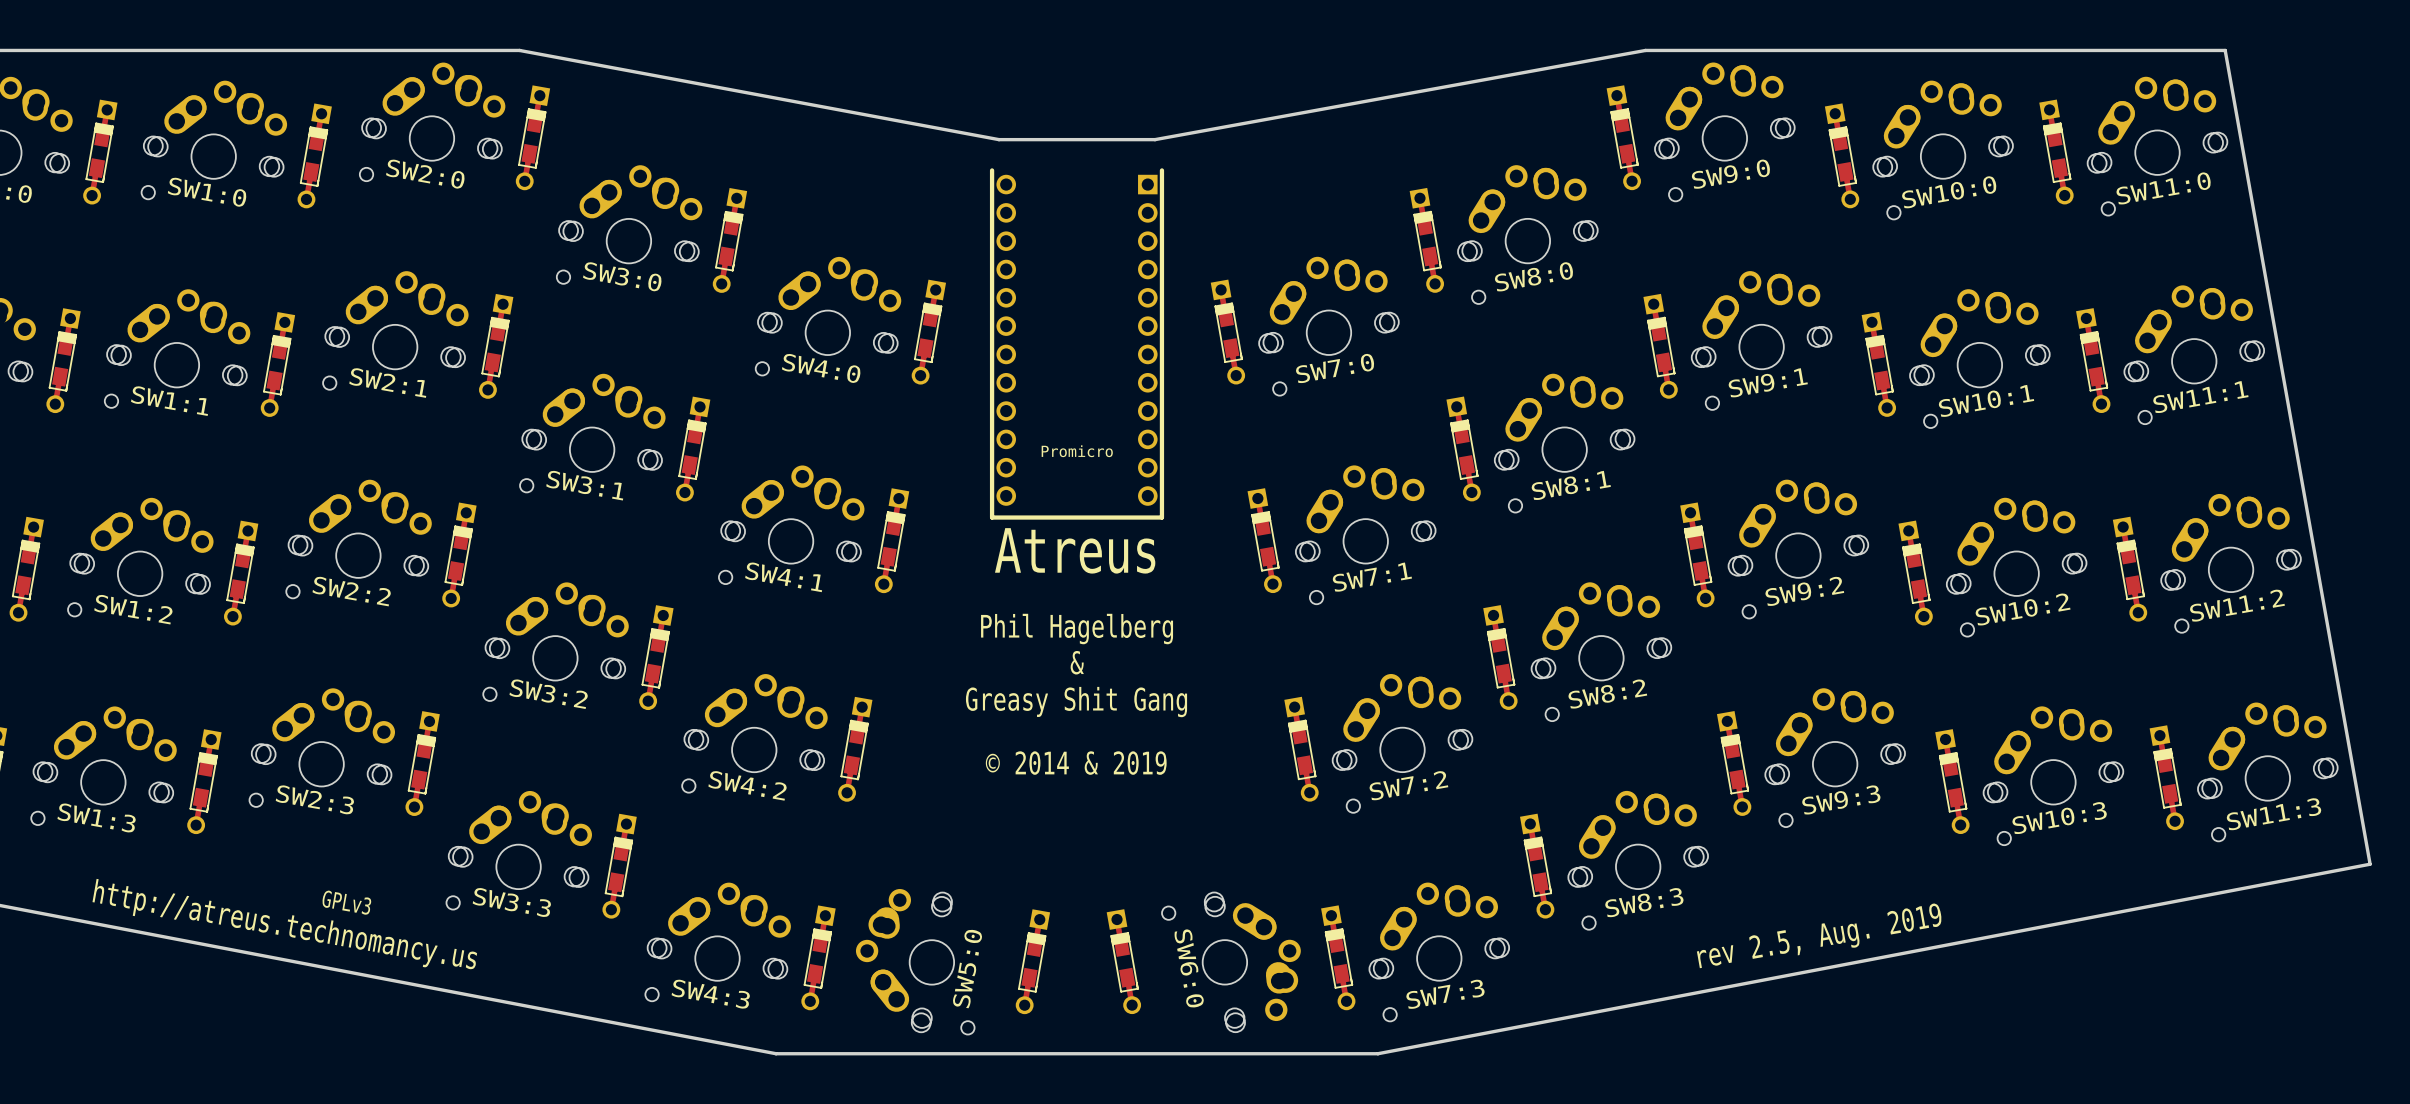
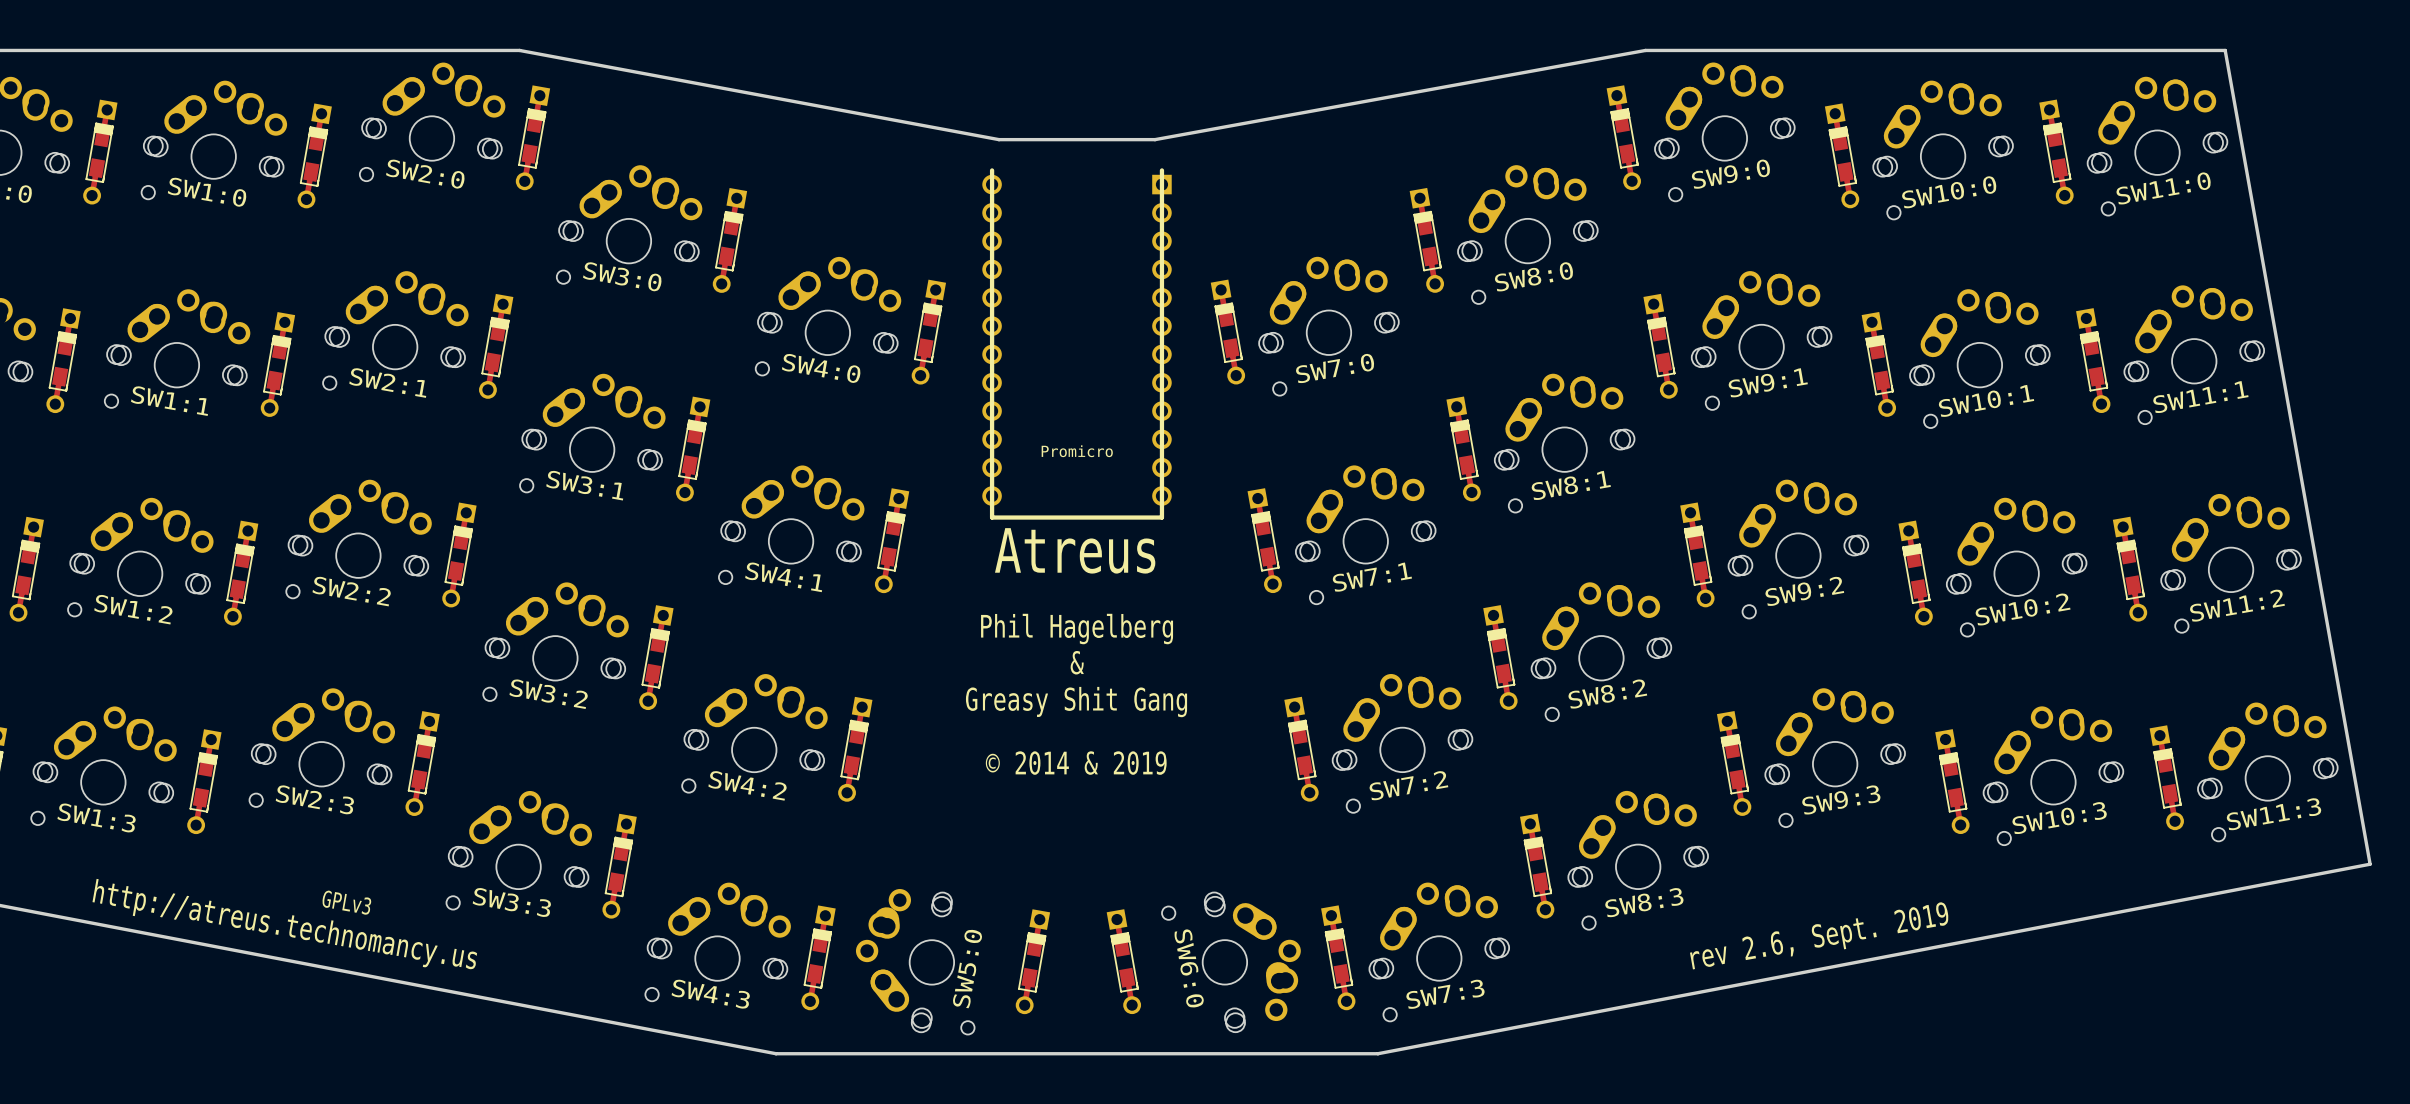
Promicro footprint: [989, 168, 1165, 520] -> [982, 168, 1172, 520]
text: rev 2.5, Aug. 2019 (1819, 935) -> rev 2.6, Sept. 2019 (1819, 935)

